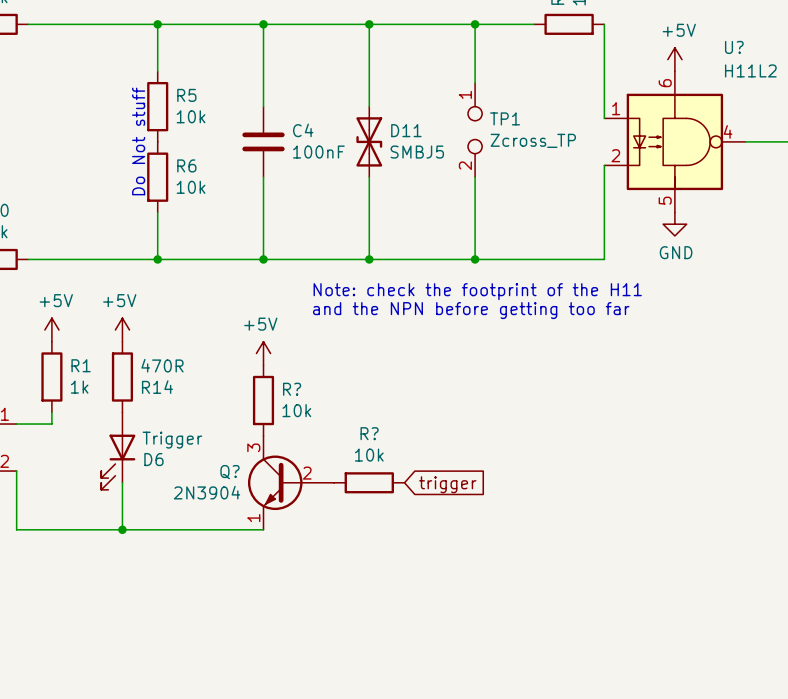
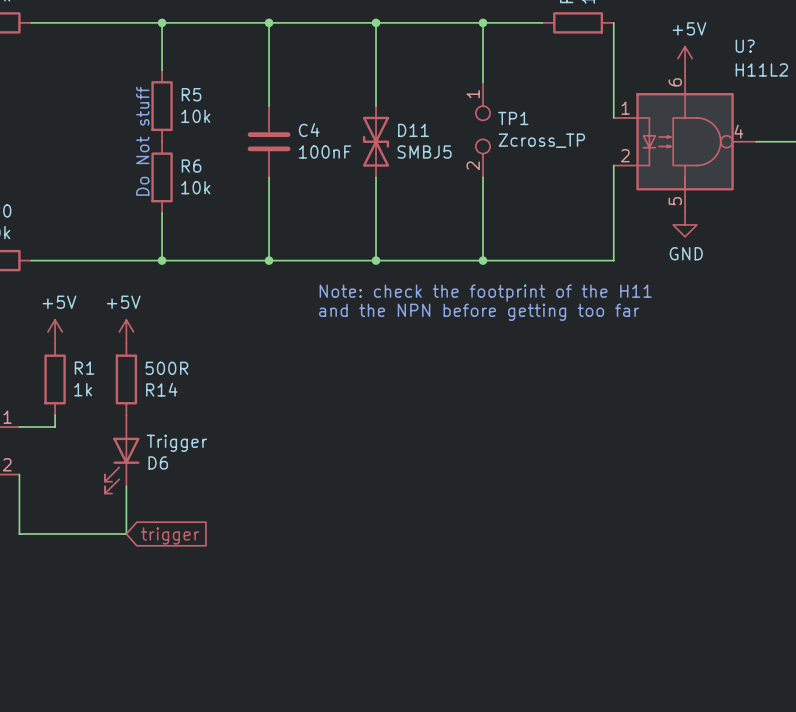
power symbol: +5V (263, 353) -> none
R14 value: 470R (162, 365) -> 500R (166, 368)
R?: 10k (263, 400) -> none
Q?: 2N3904 (291, 482) -> none
R?: 10k (369, 482) -> none
global label: trigger (447, 484) -> none
wire: (122, 529) (263, 529) -> none
junction: (122, 529) -> none
global label: none -> trigger (170, 535)

